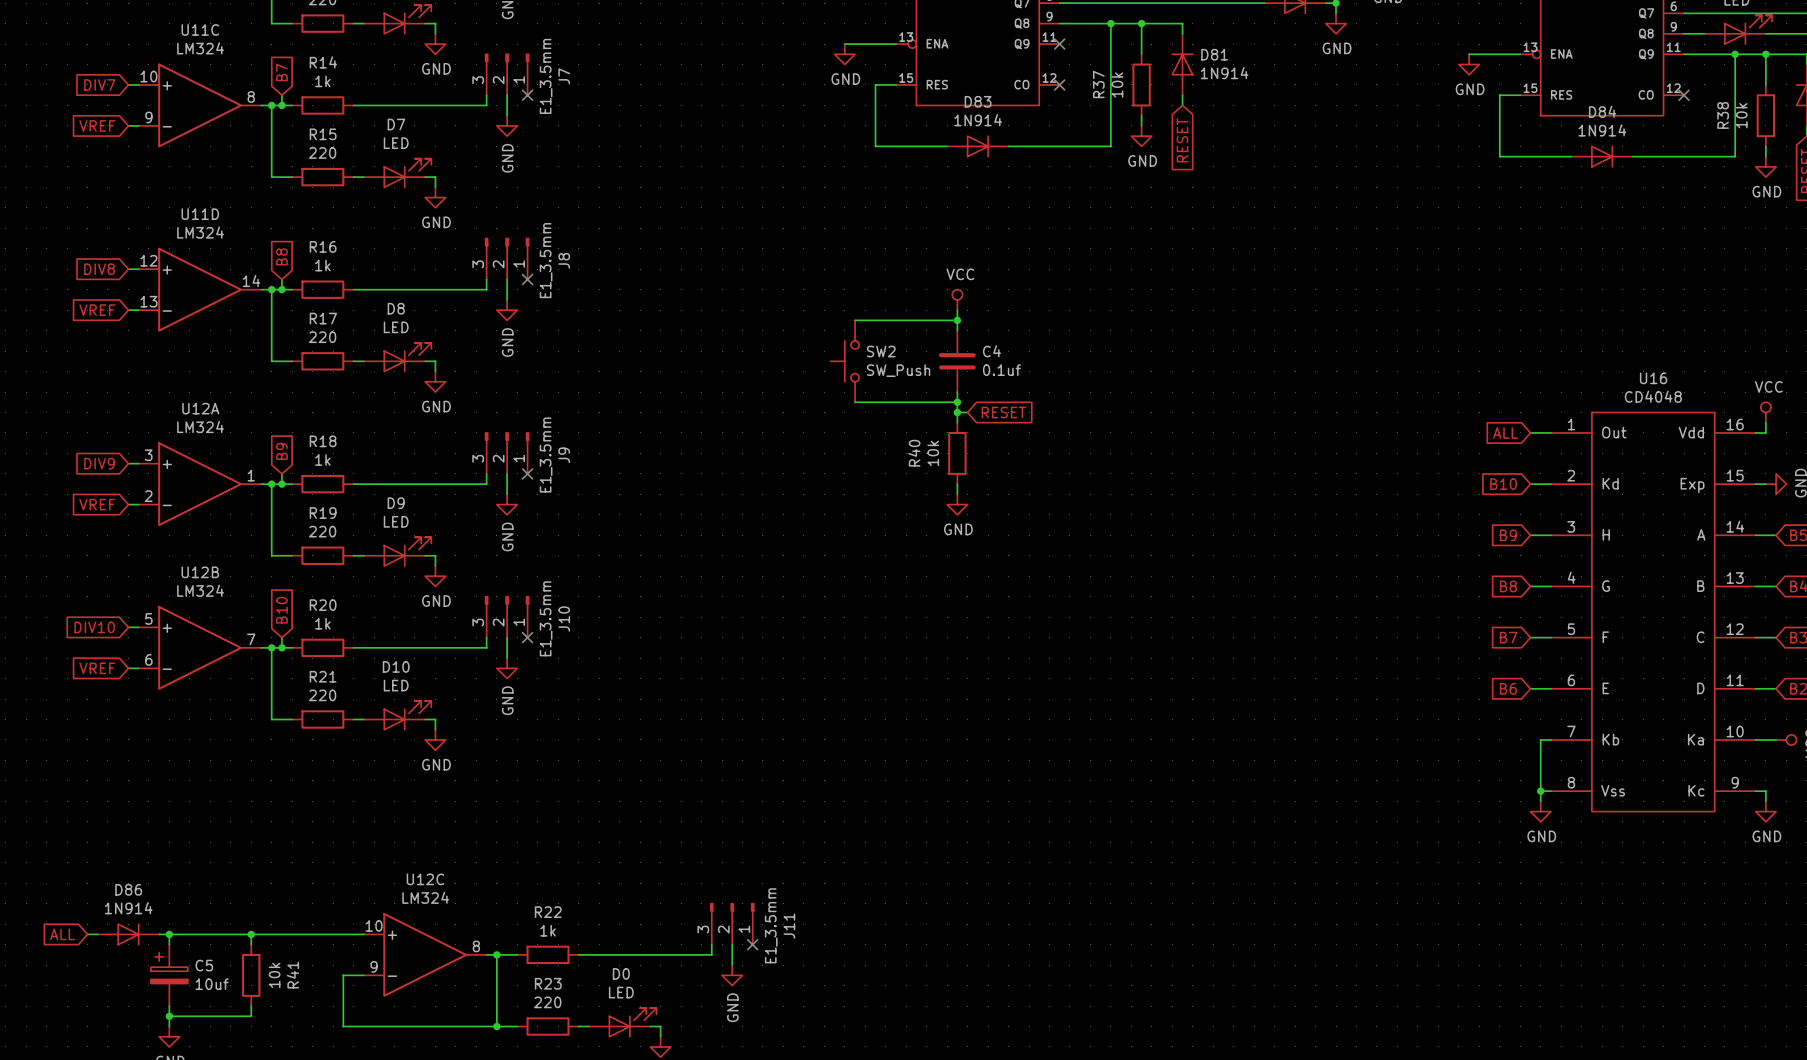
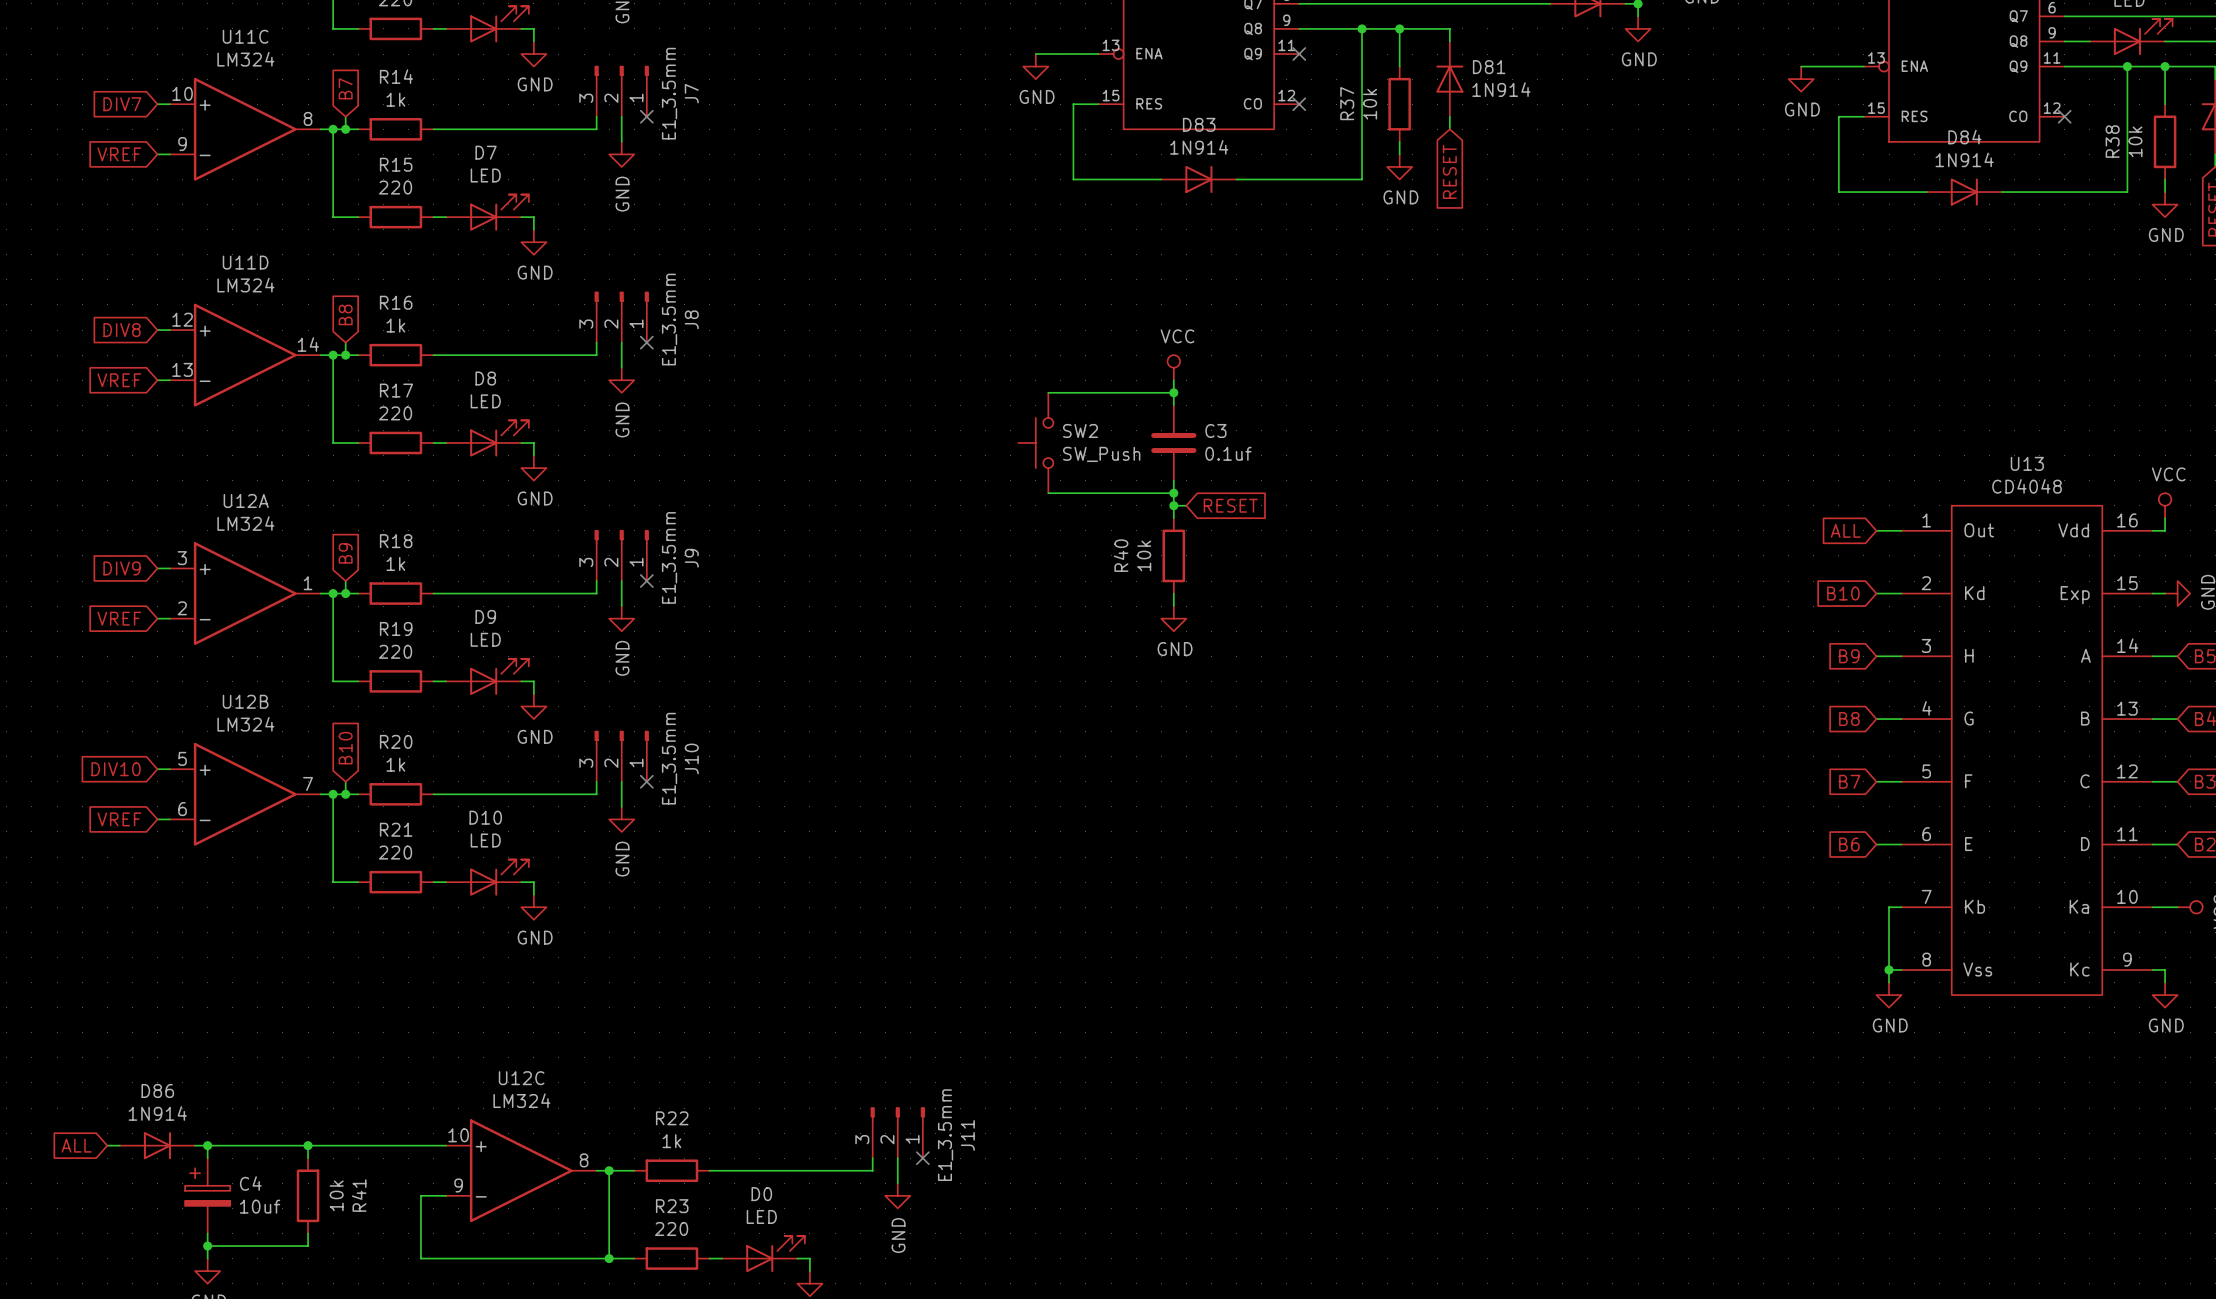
C4 name: C4 (991, 351) -> C3 (1215, 430)
U16 name: U16 (1653, 378) -> U13 (2027, 463)
C5 name: C5 (204, 965) -> C4 (250, 1183)

